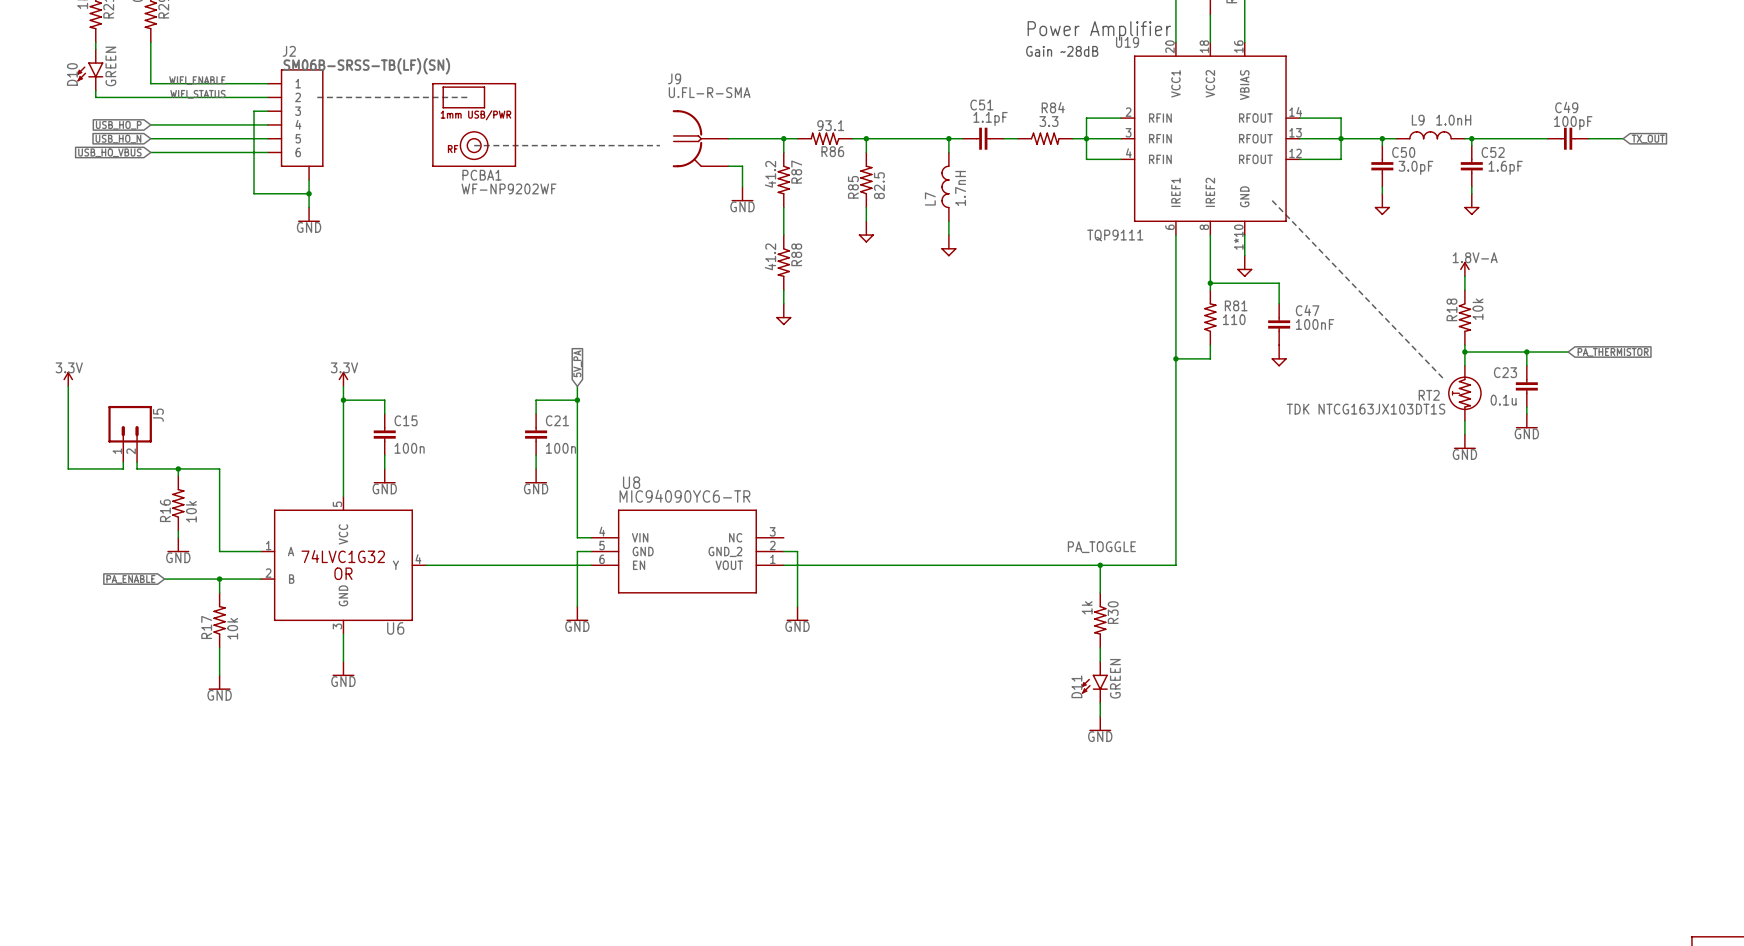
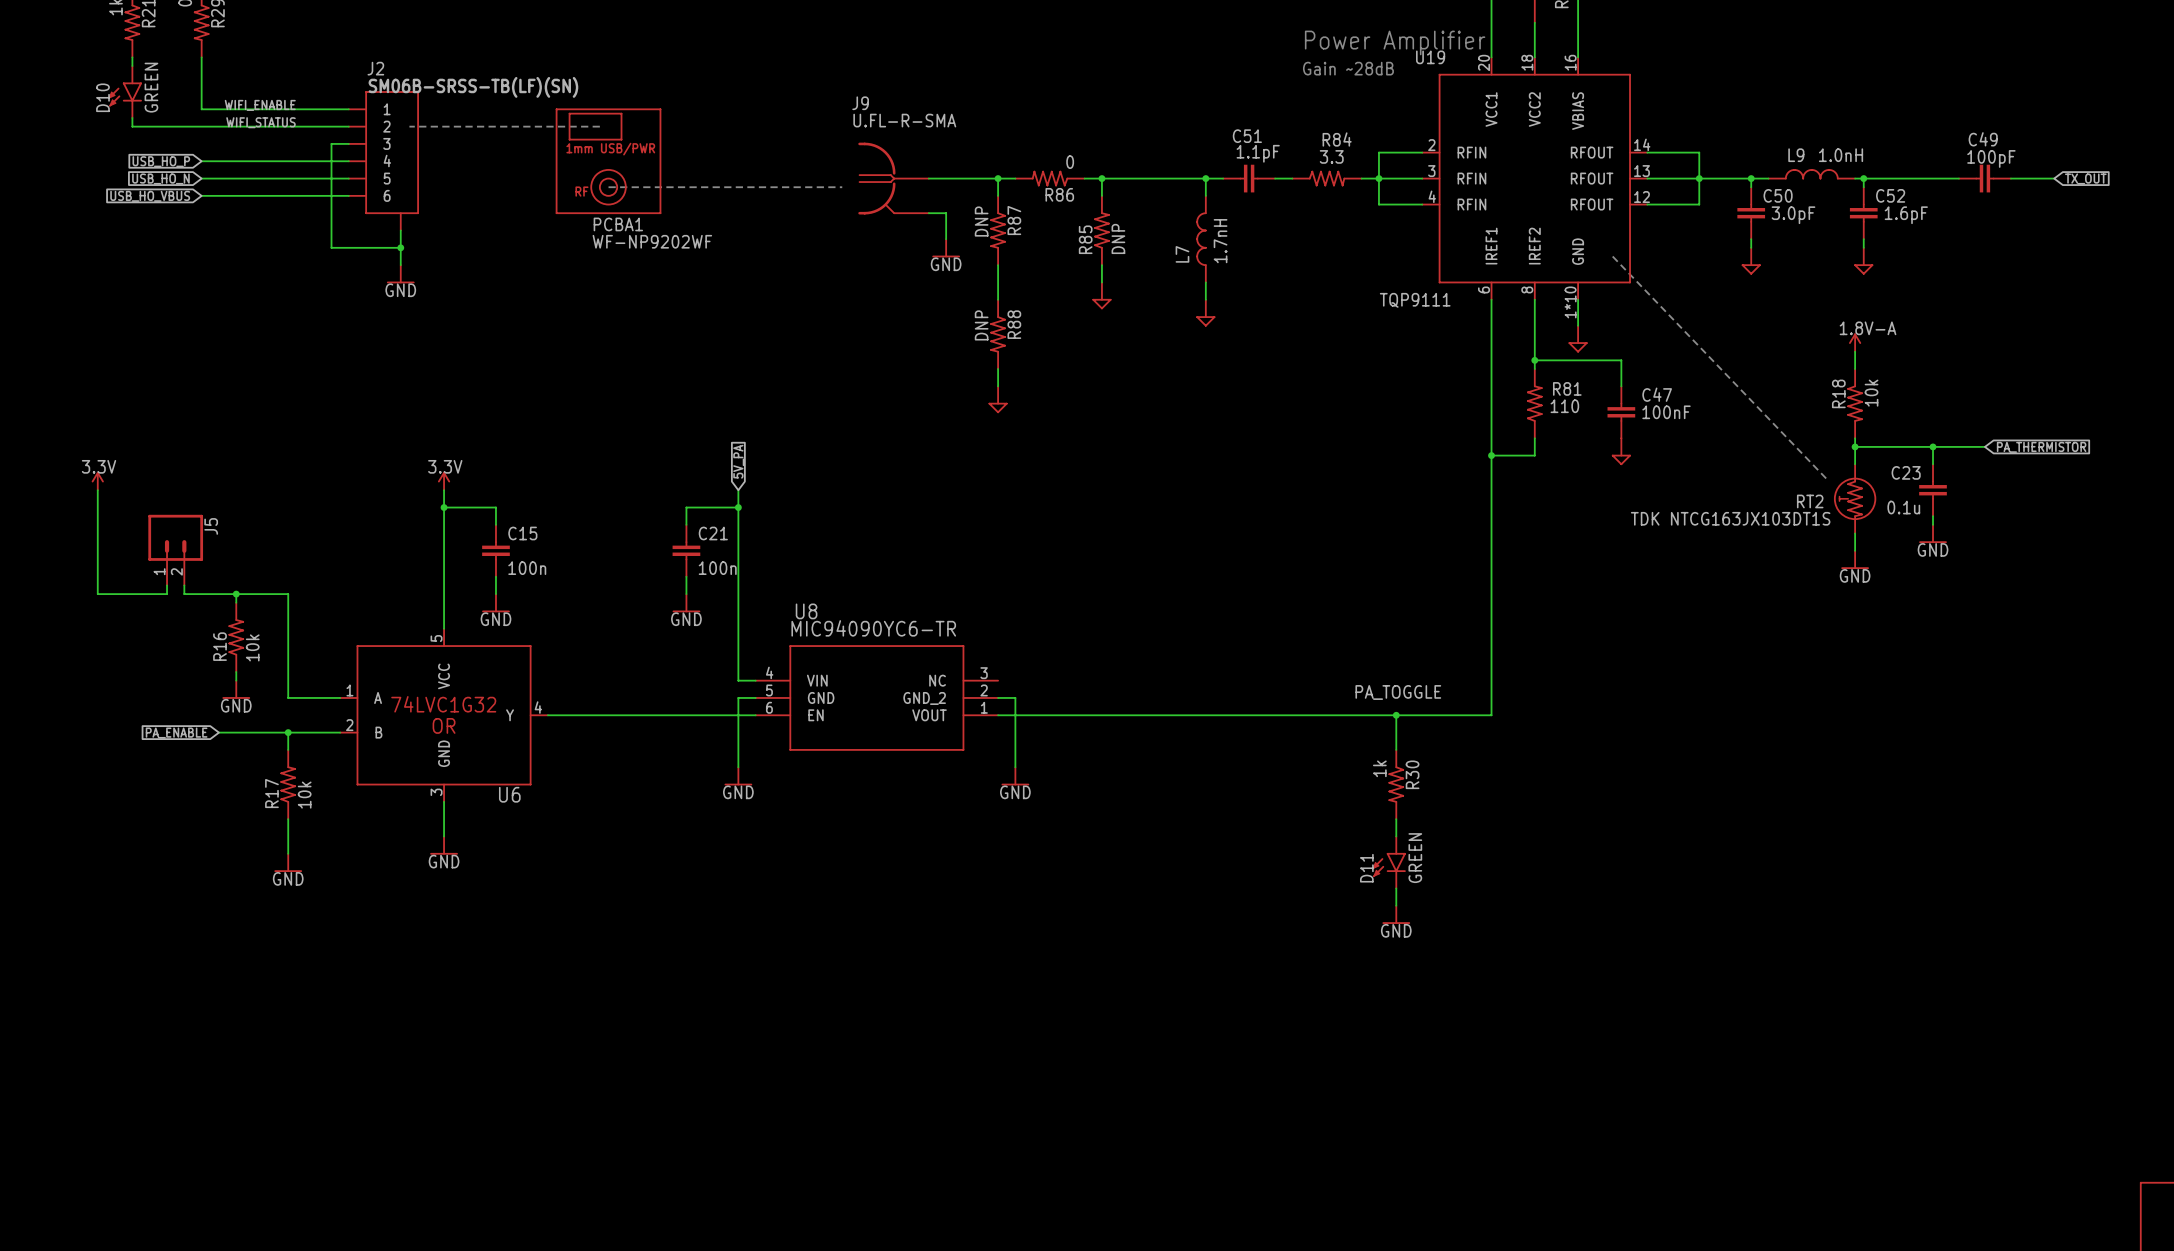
R86 value: 93.1 (830, 125) -> 0 (1070, 162)
R87 value: 41.2 (770, 174) -> DNP (981, 221)
R85 value: 82.5 (879, 185) -> DNP (1118, 238)
R88 value: 41.2 (770, 256) -> DNP (981, 325)

